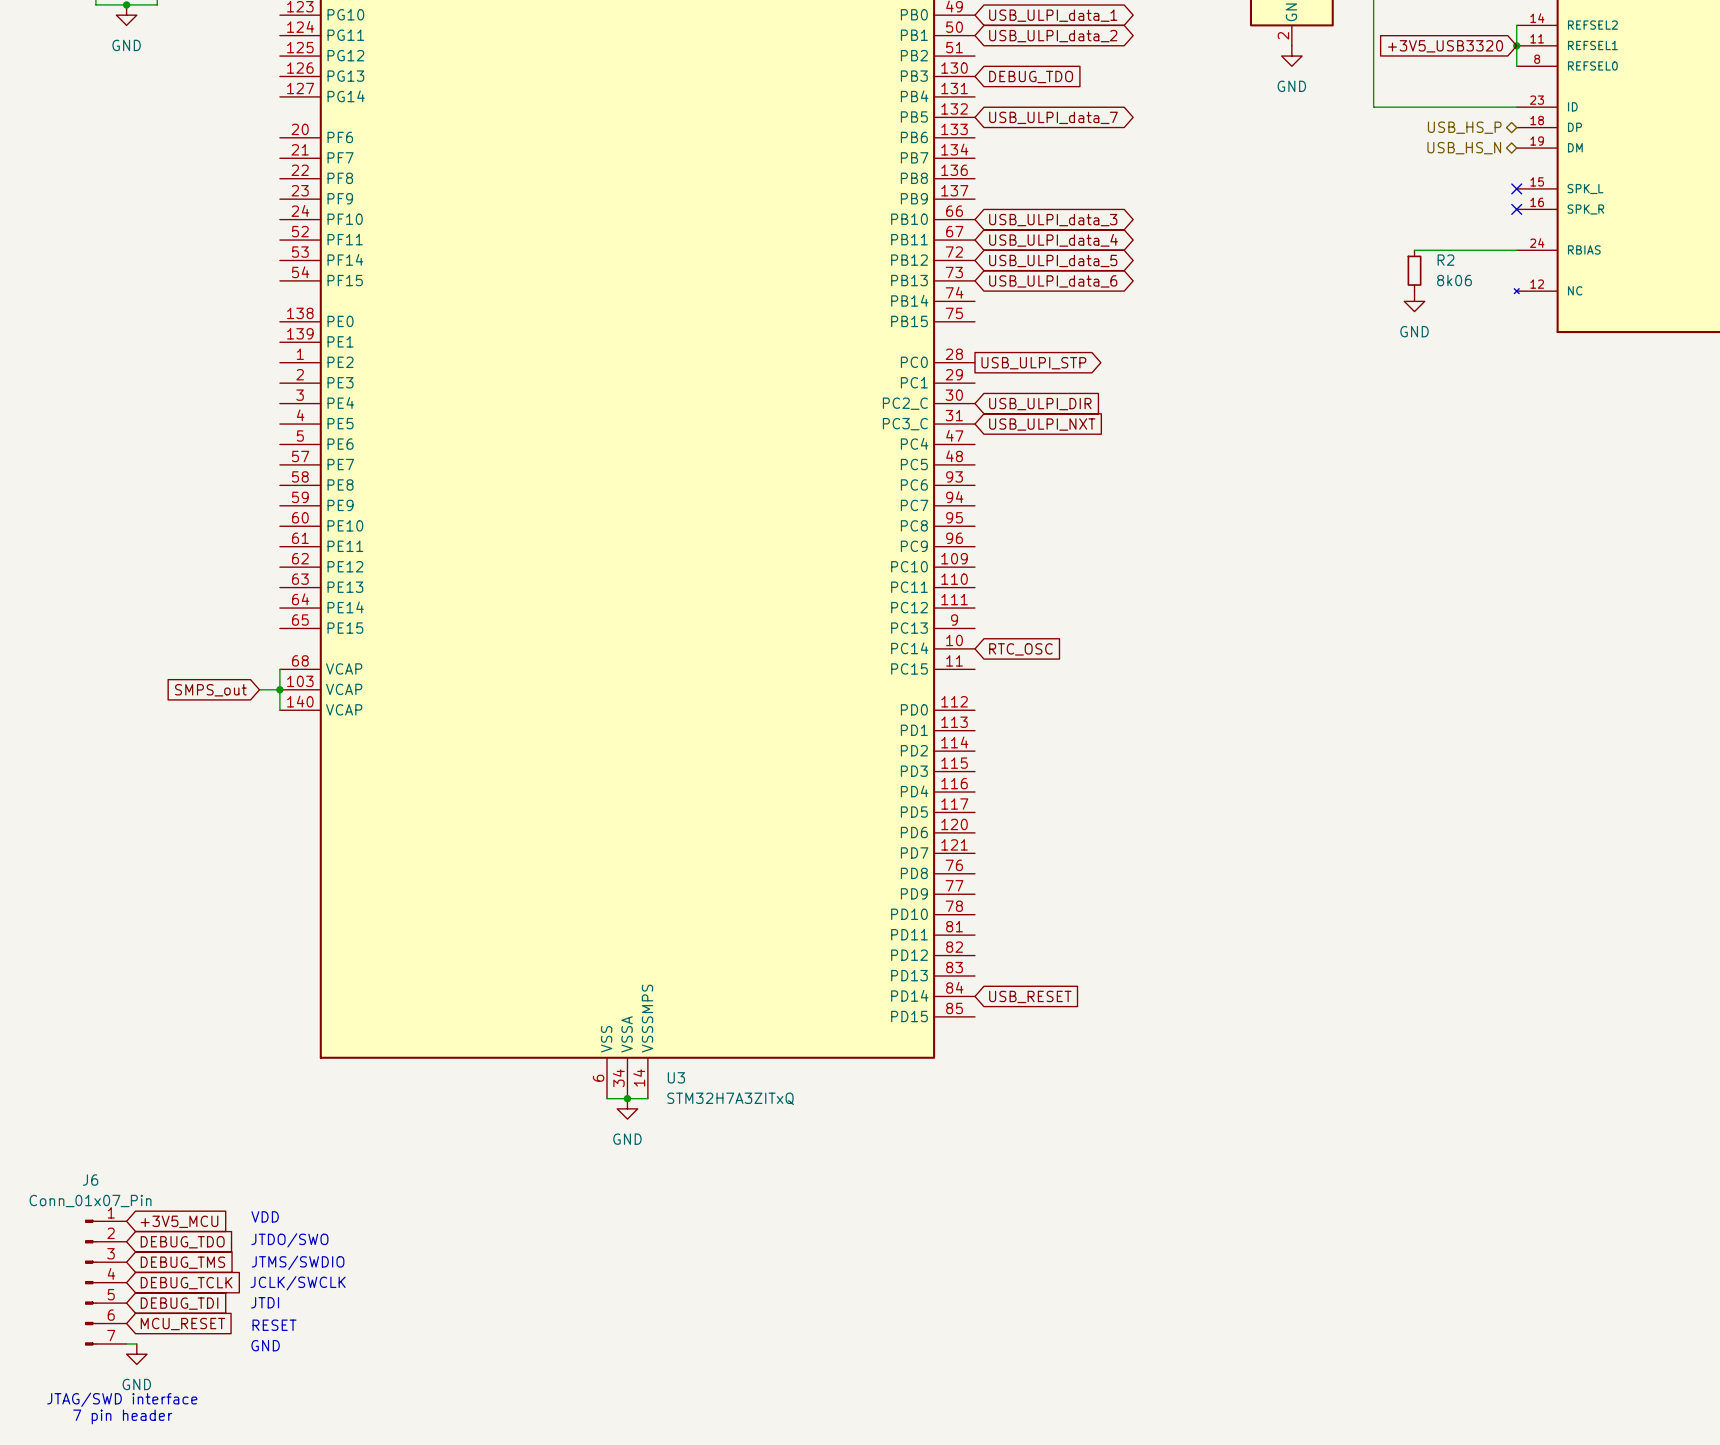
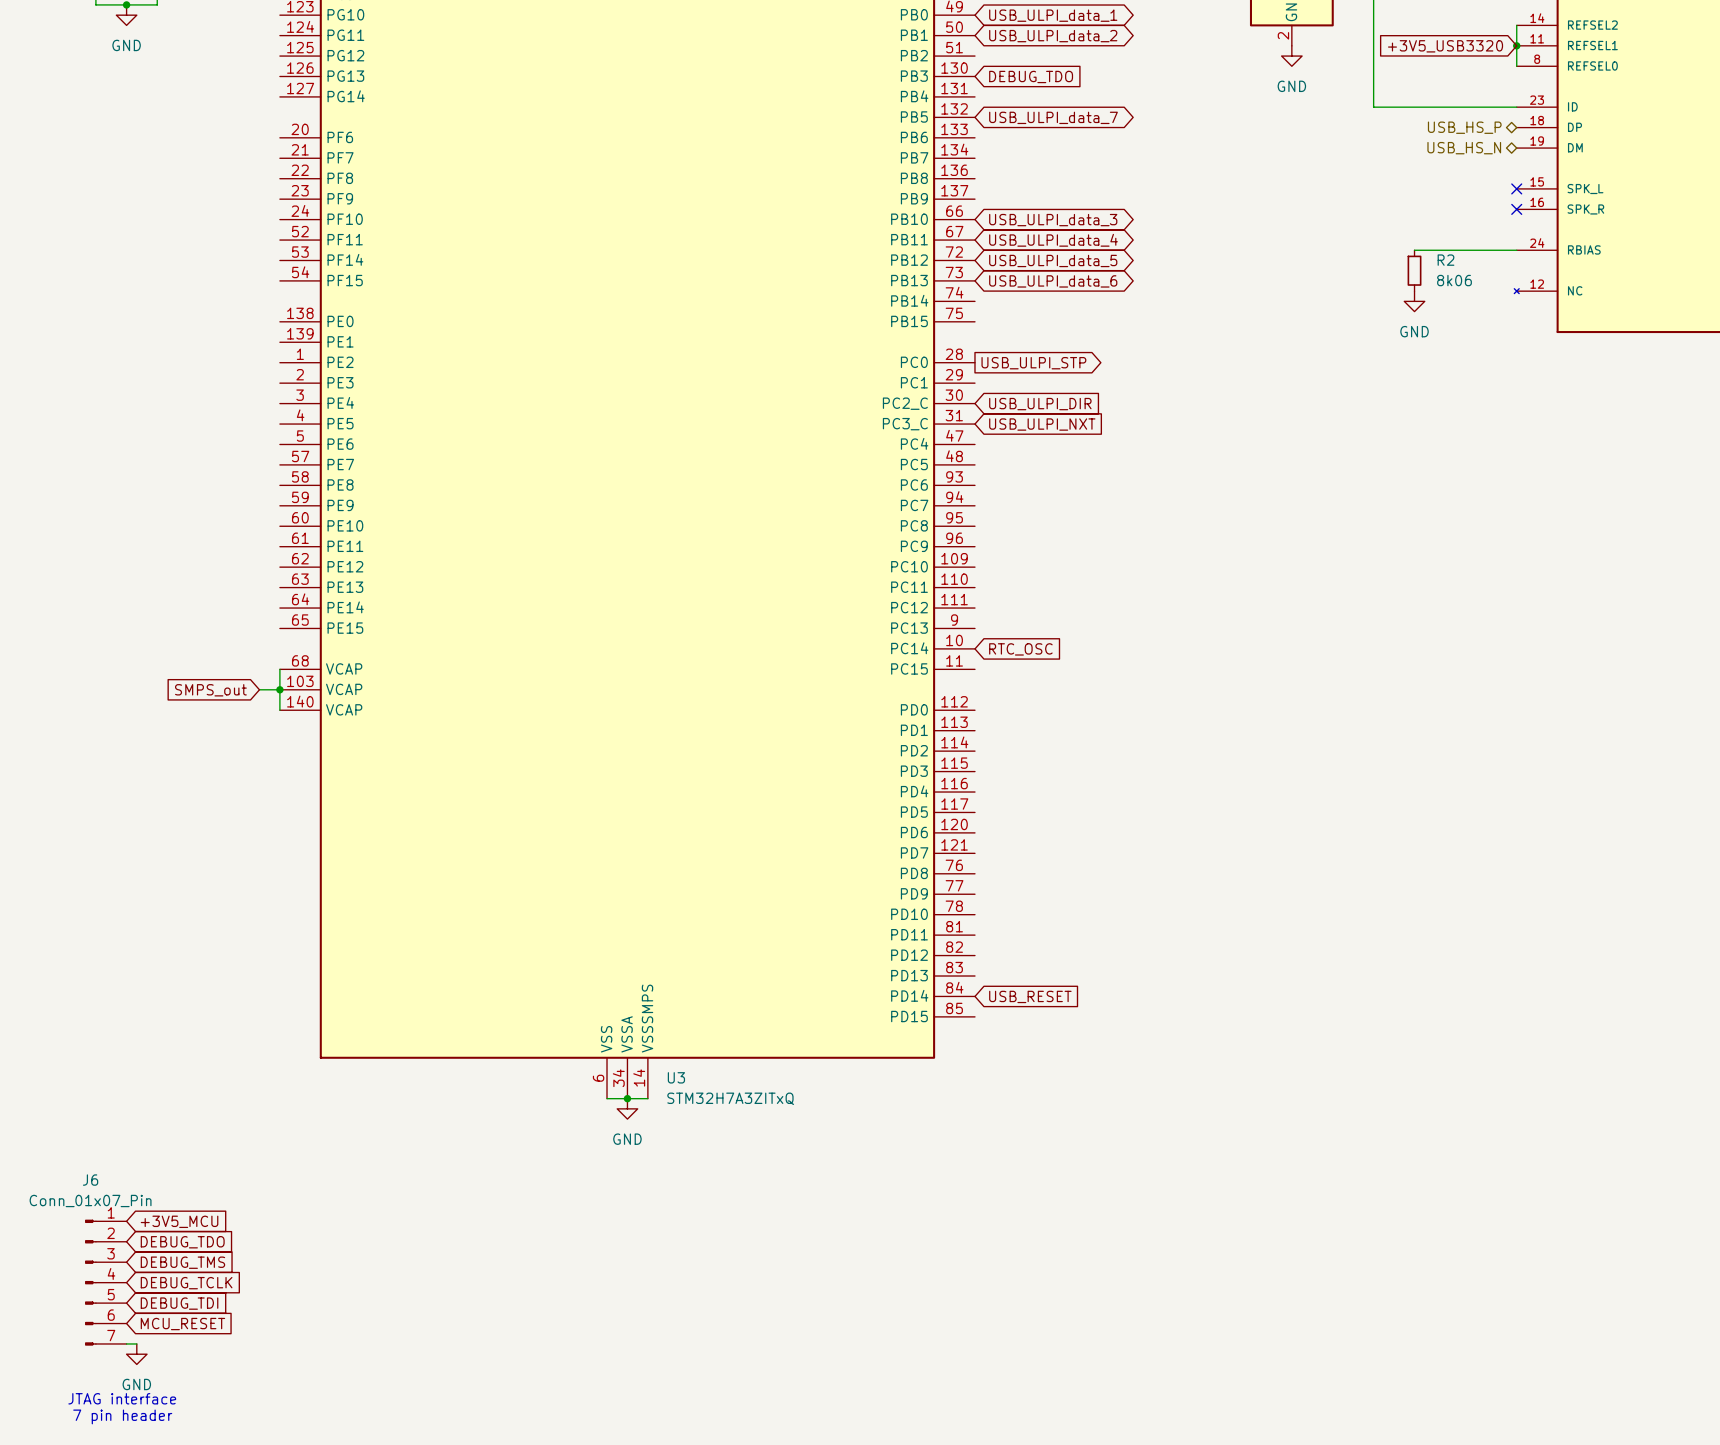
text: VDD (265, 1216) -> none
text: JTDO/SWO (289, 1240) -> none
text: JTMS/SWDIO (298, 1262) -> none
text: JCLK/SWCLK (298, 1283) -> none
text: JTDI (265, 1302) -> none
text: RESET (274, 1325) -> none
text: GND (265, 1345) -> none
text: JTAG/SWD interface (122, 1399) -> JTAG interface (122, 1398)

